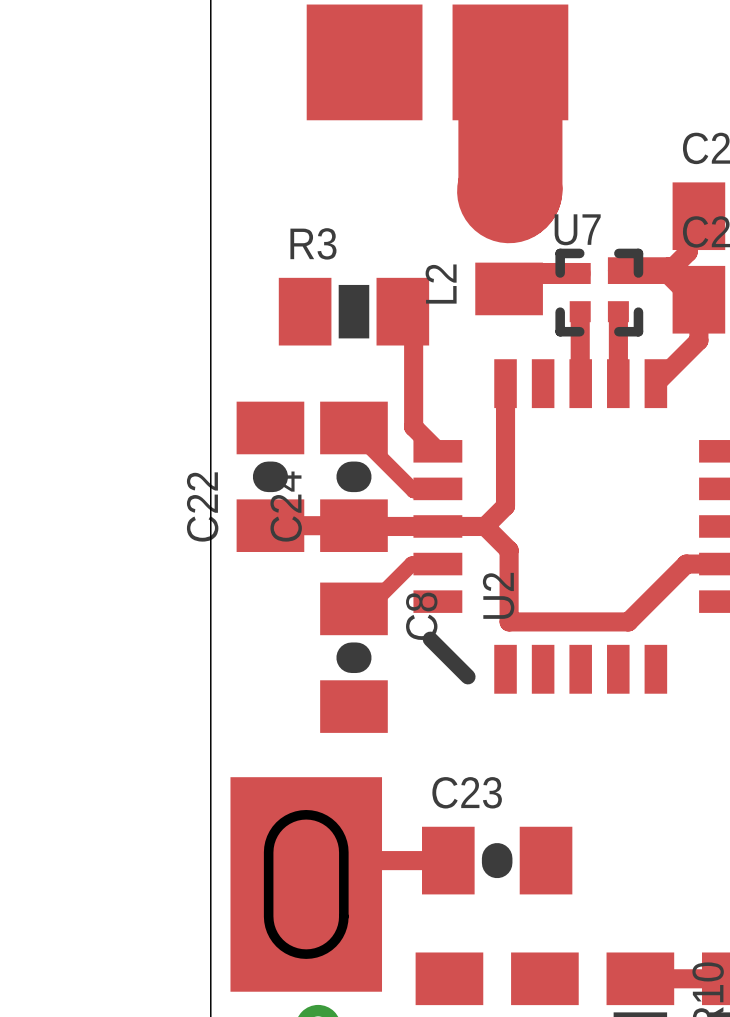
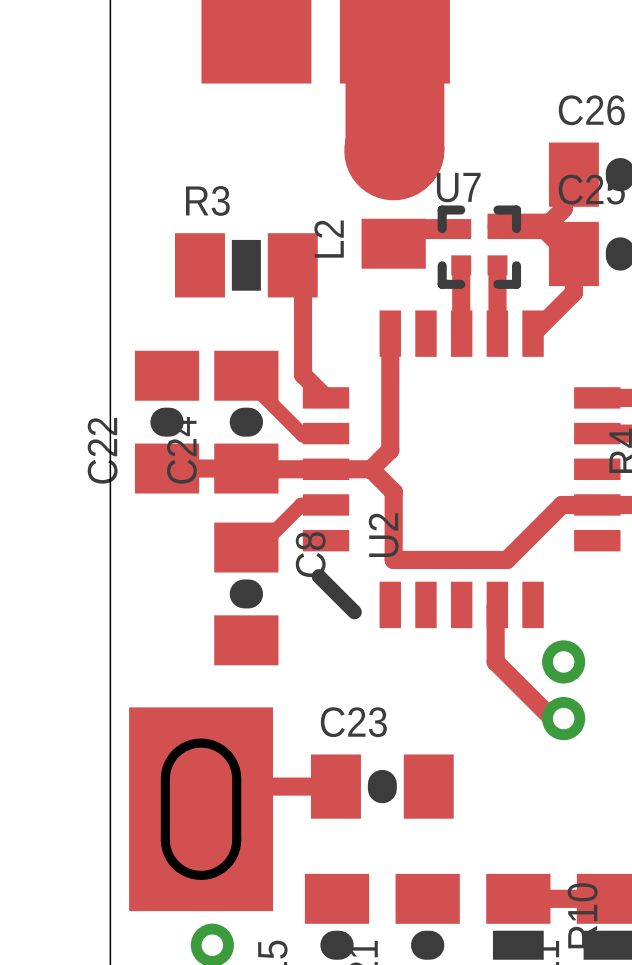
track: none -> (497, 604) (495, 606) (495, 661) (552, 718) (563, 718)
via: none -> (563, 661)
via: none -> (563, 718)

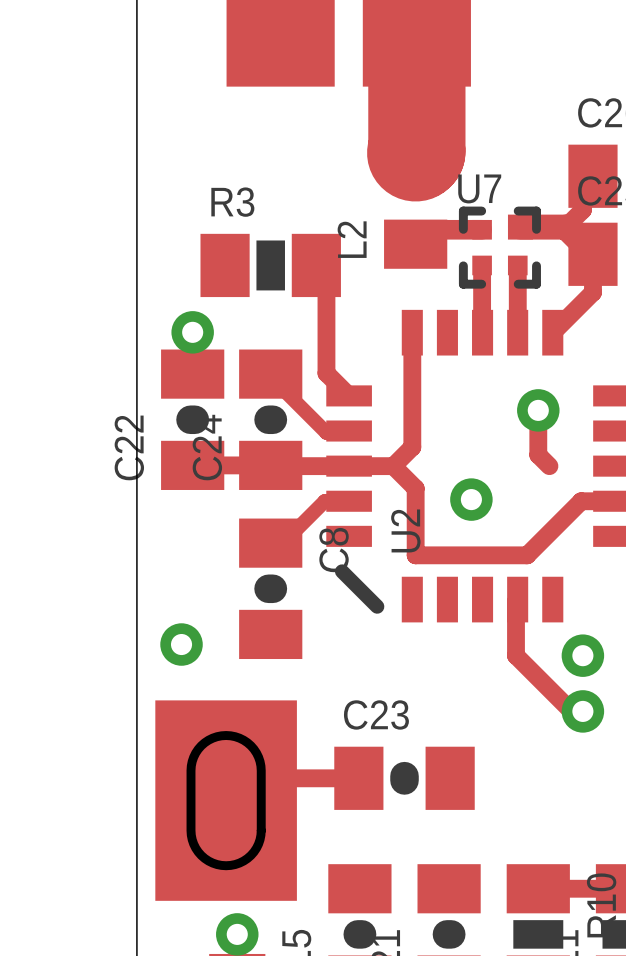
via: none -> (192, 332)
track: none -> (538, 410) (538, 454) (549, 466)
via: none -> (538, 410)
via: none -> (471, 499)
via: none -> (181, 644)

